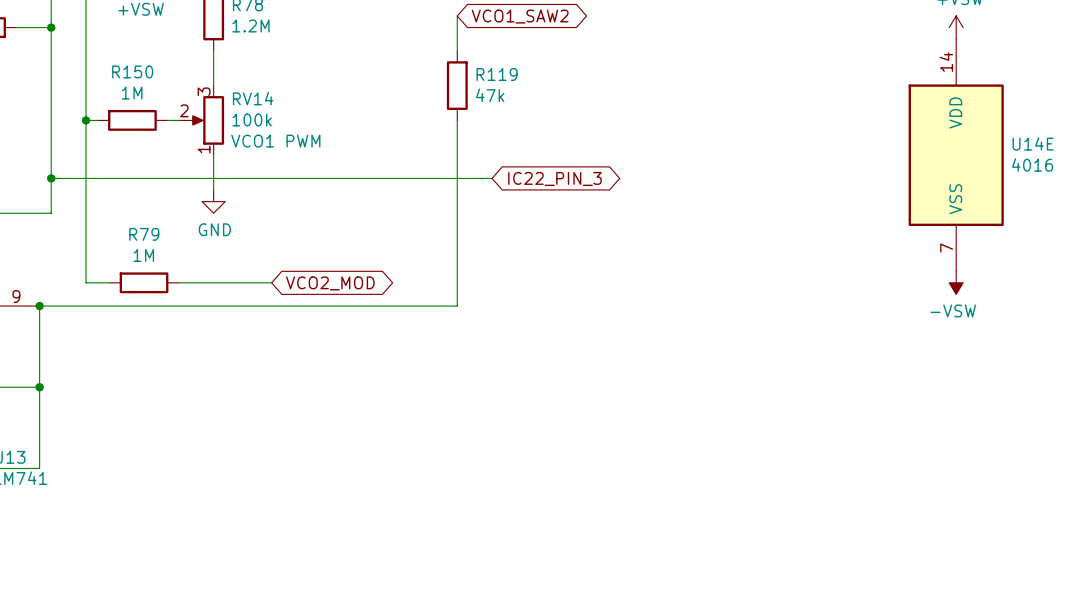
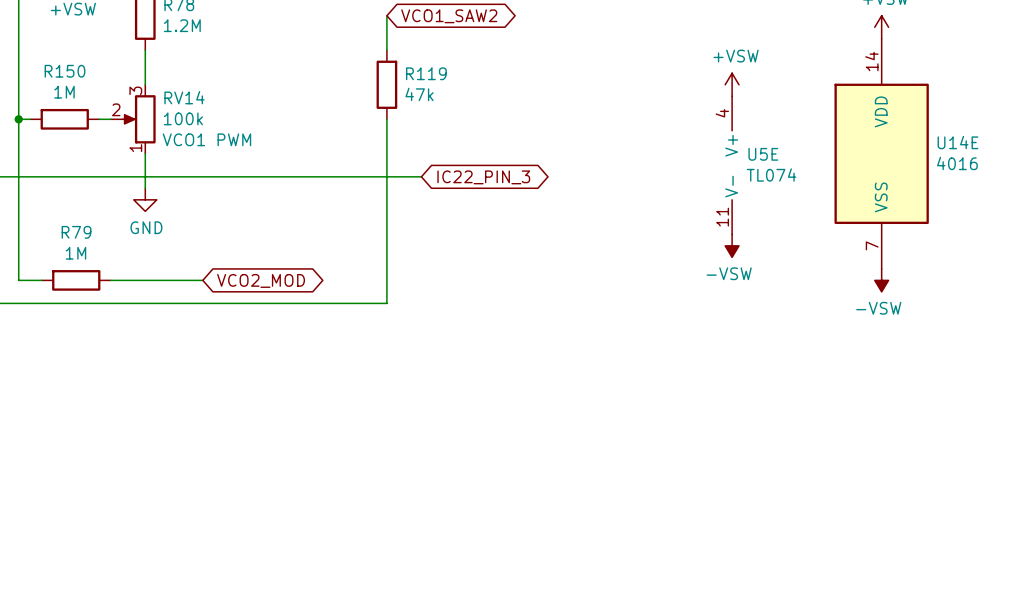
power symbol: none -> +VSW (732, 84)
U5E: none -> TL074 (732, 165)
power symbol: none -> -VSW (732, 245)

